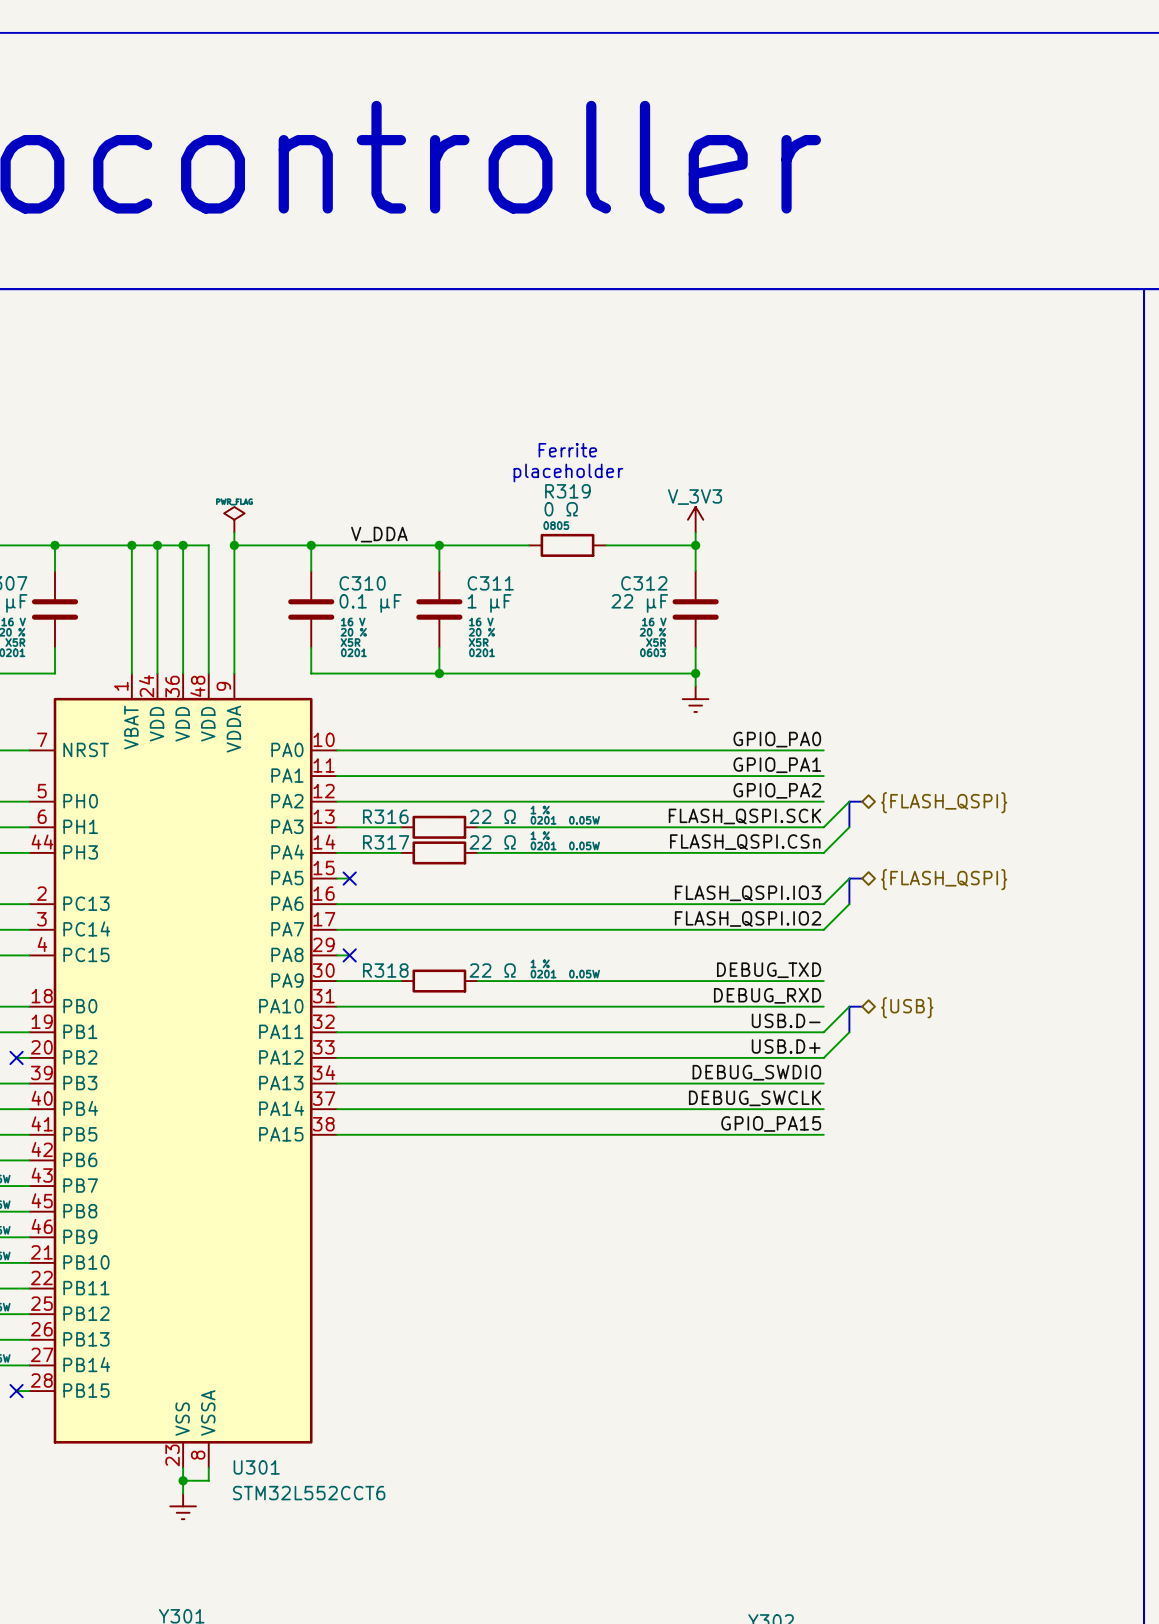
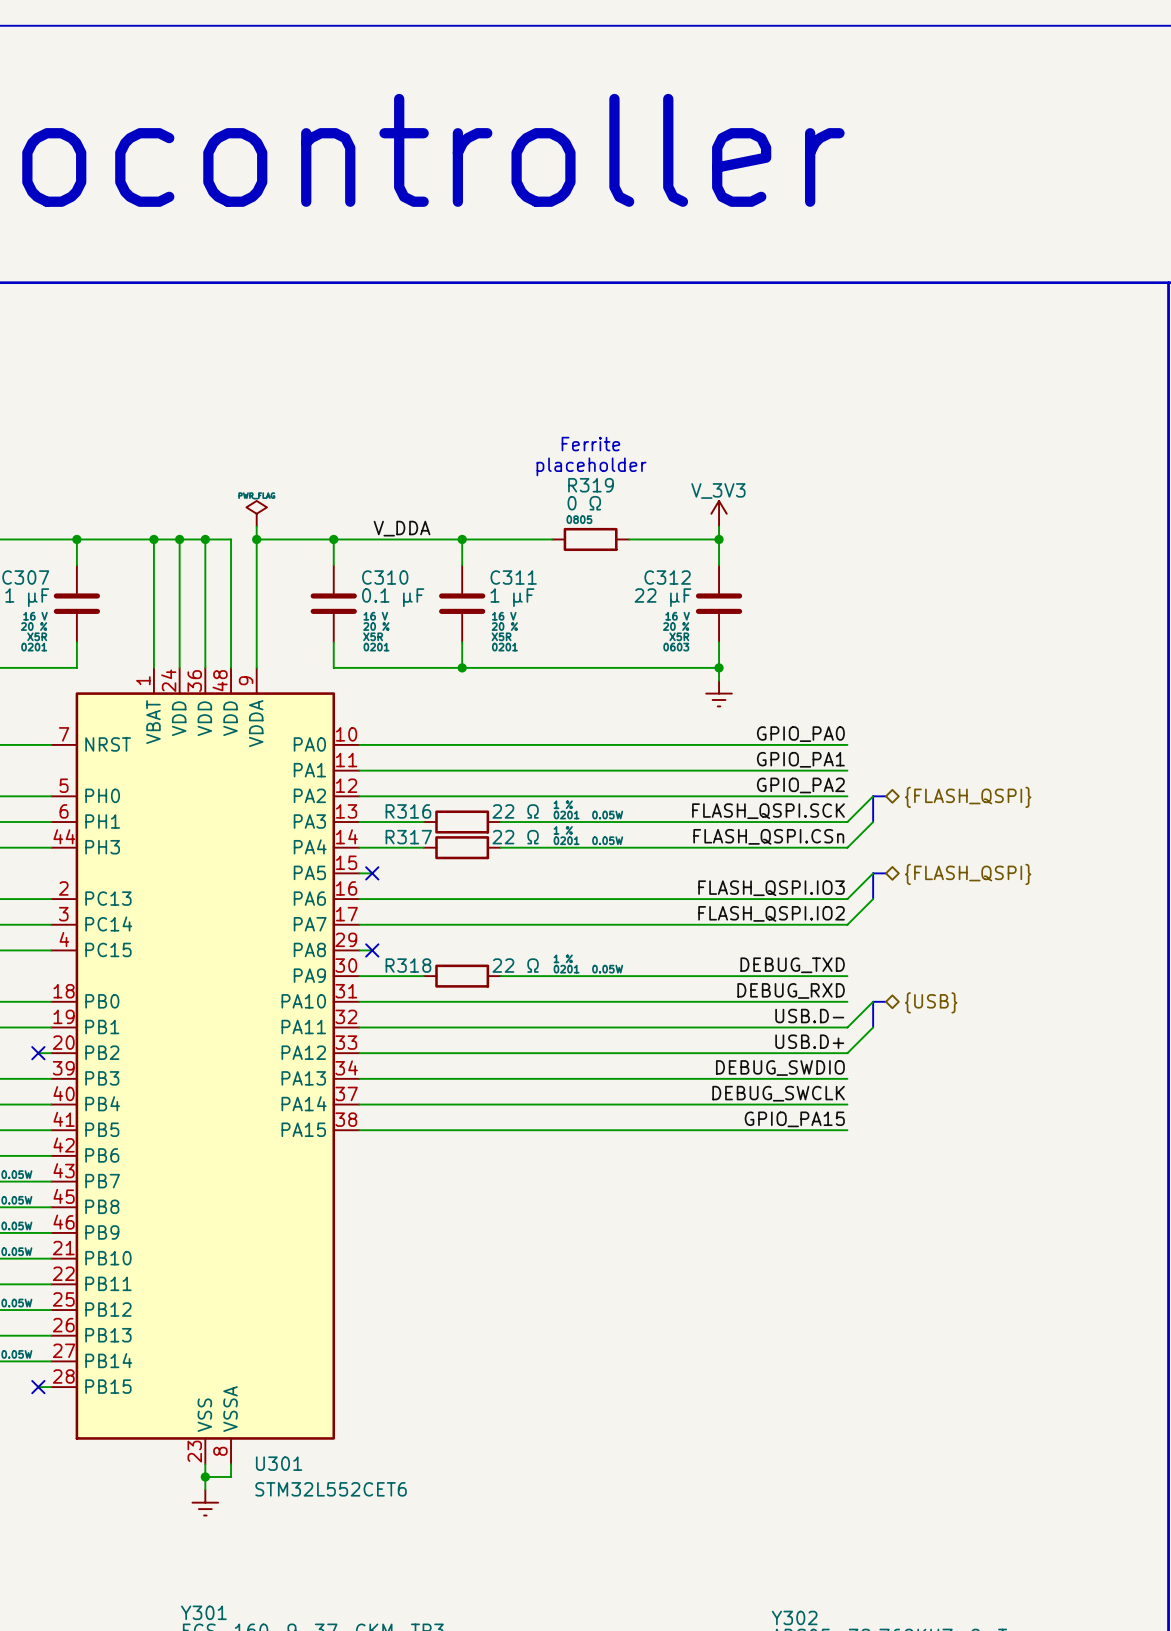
U301 value: STM32L552CCT6 (309, 1493) -> STM32L552CET6 (331, 1489)

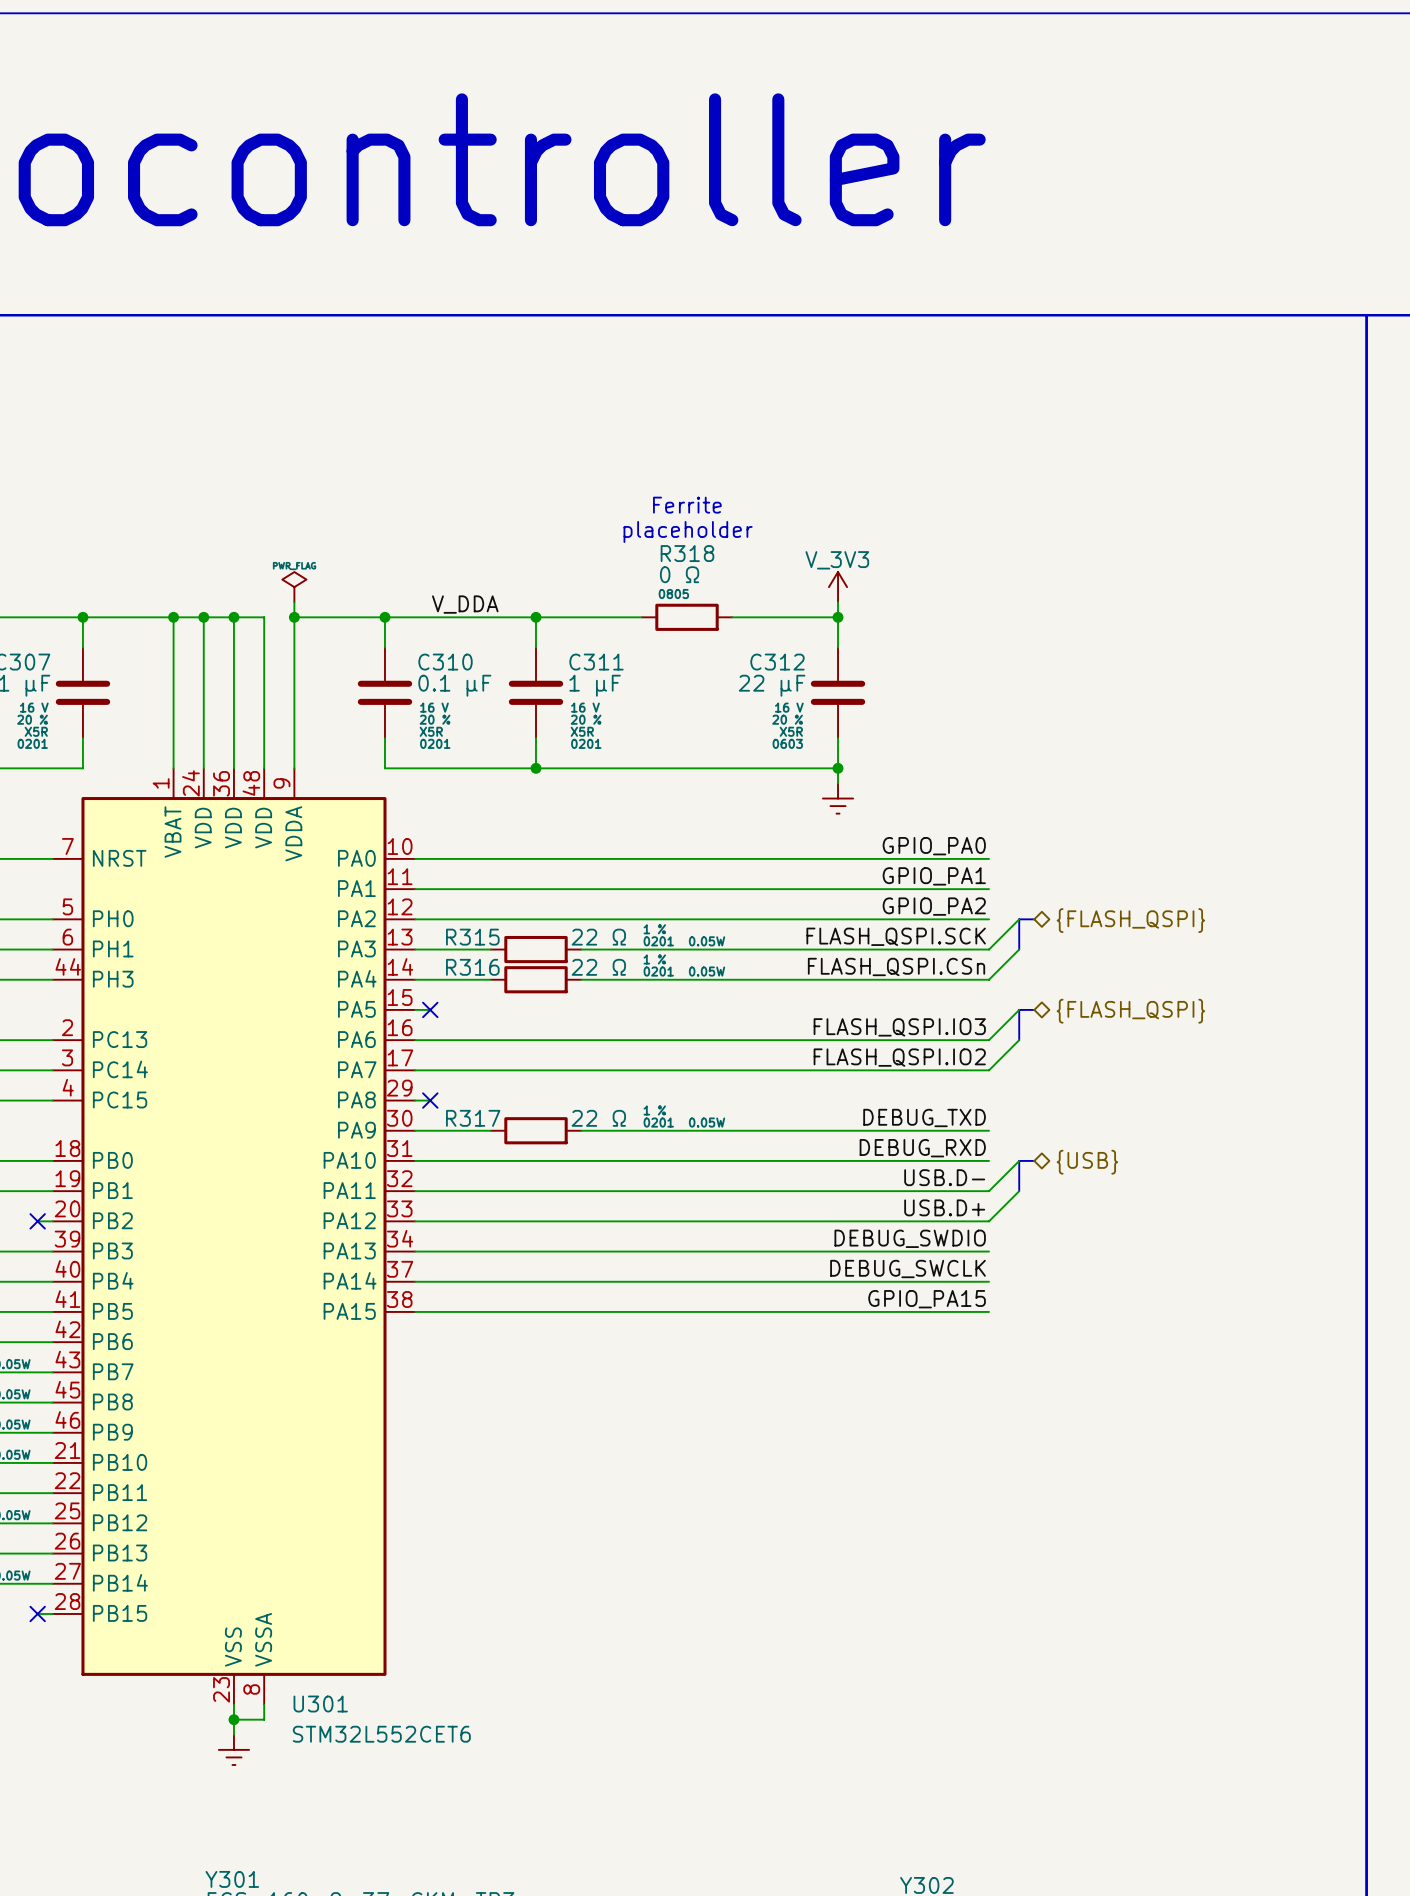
R319 name: R319 (591, 485) -> R318 (687, 553)
R316 name: R316 (408, 811) -> R315 (472, 937)
R317 name: R317 (408, 837) -> R316 (472, 967)
R318 name: R318 (408, 965) -> R317 (473, 1118)

